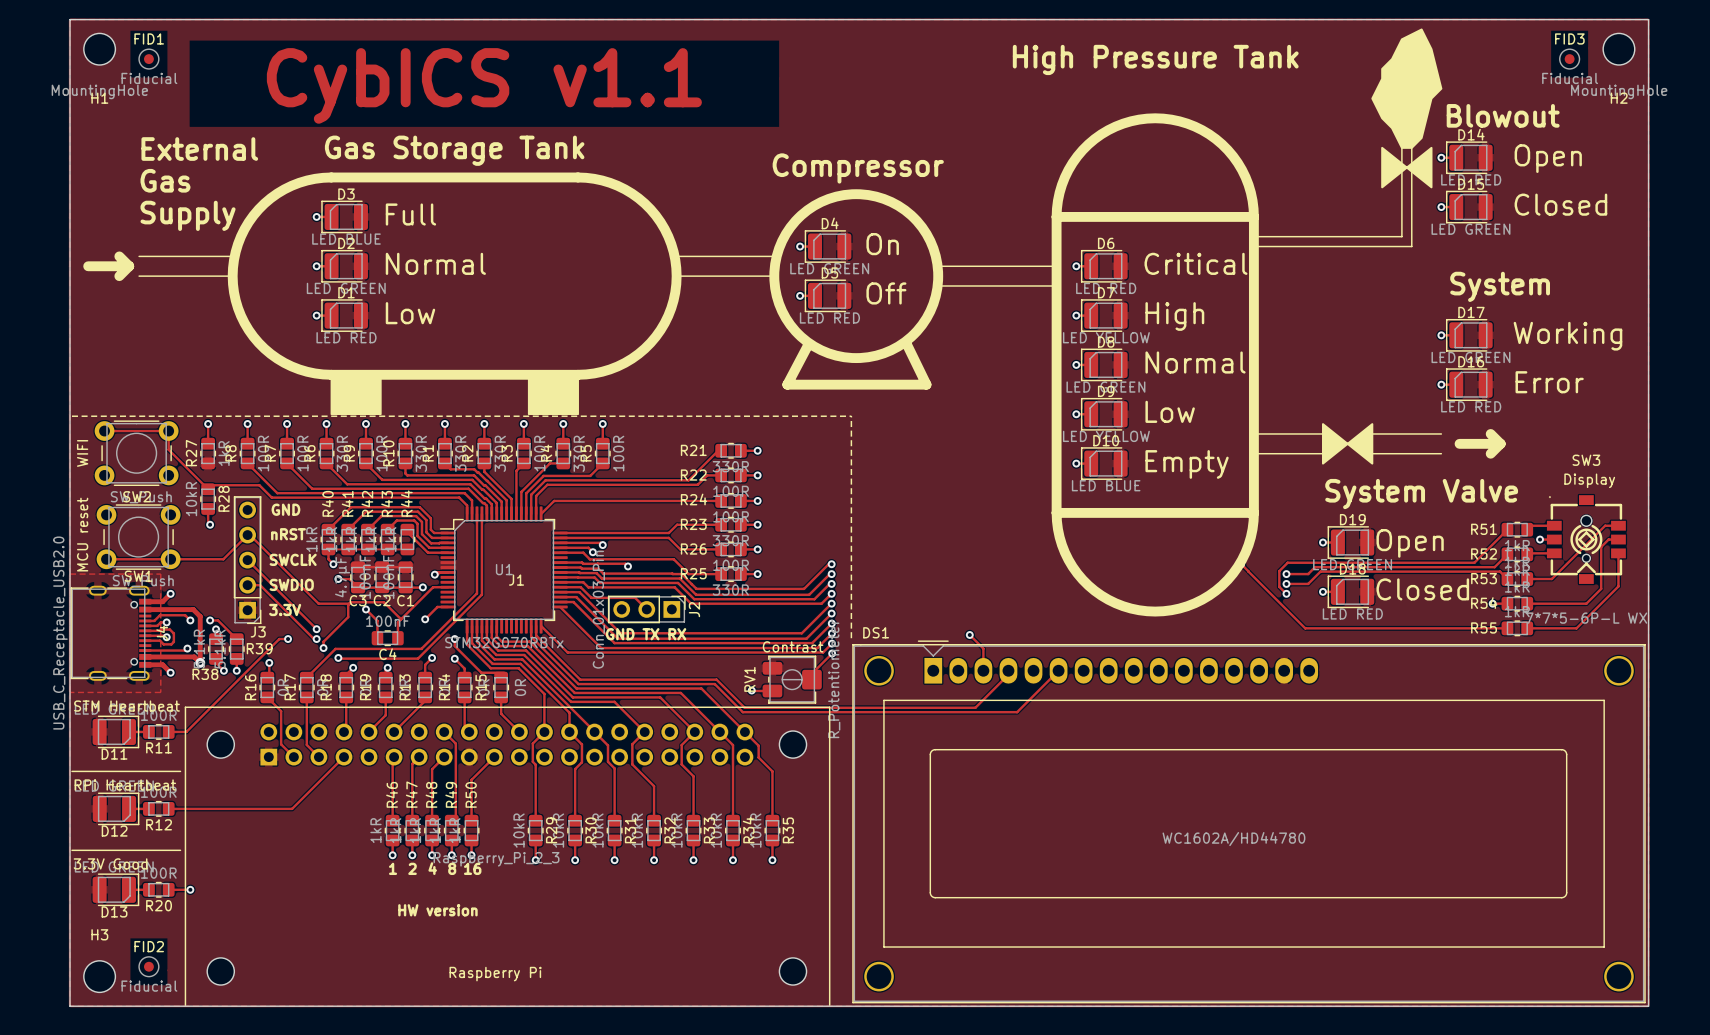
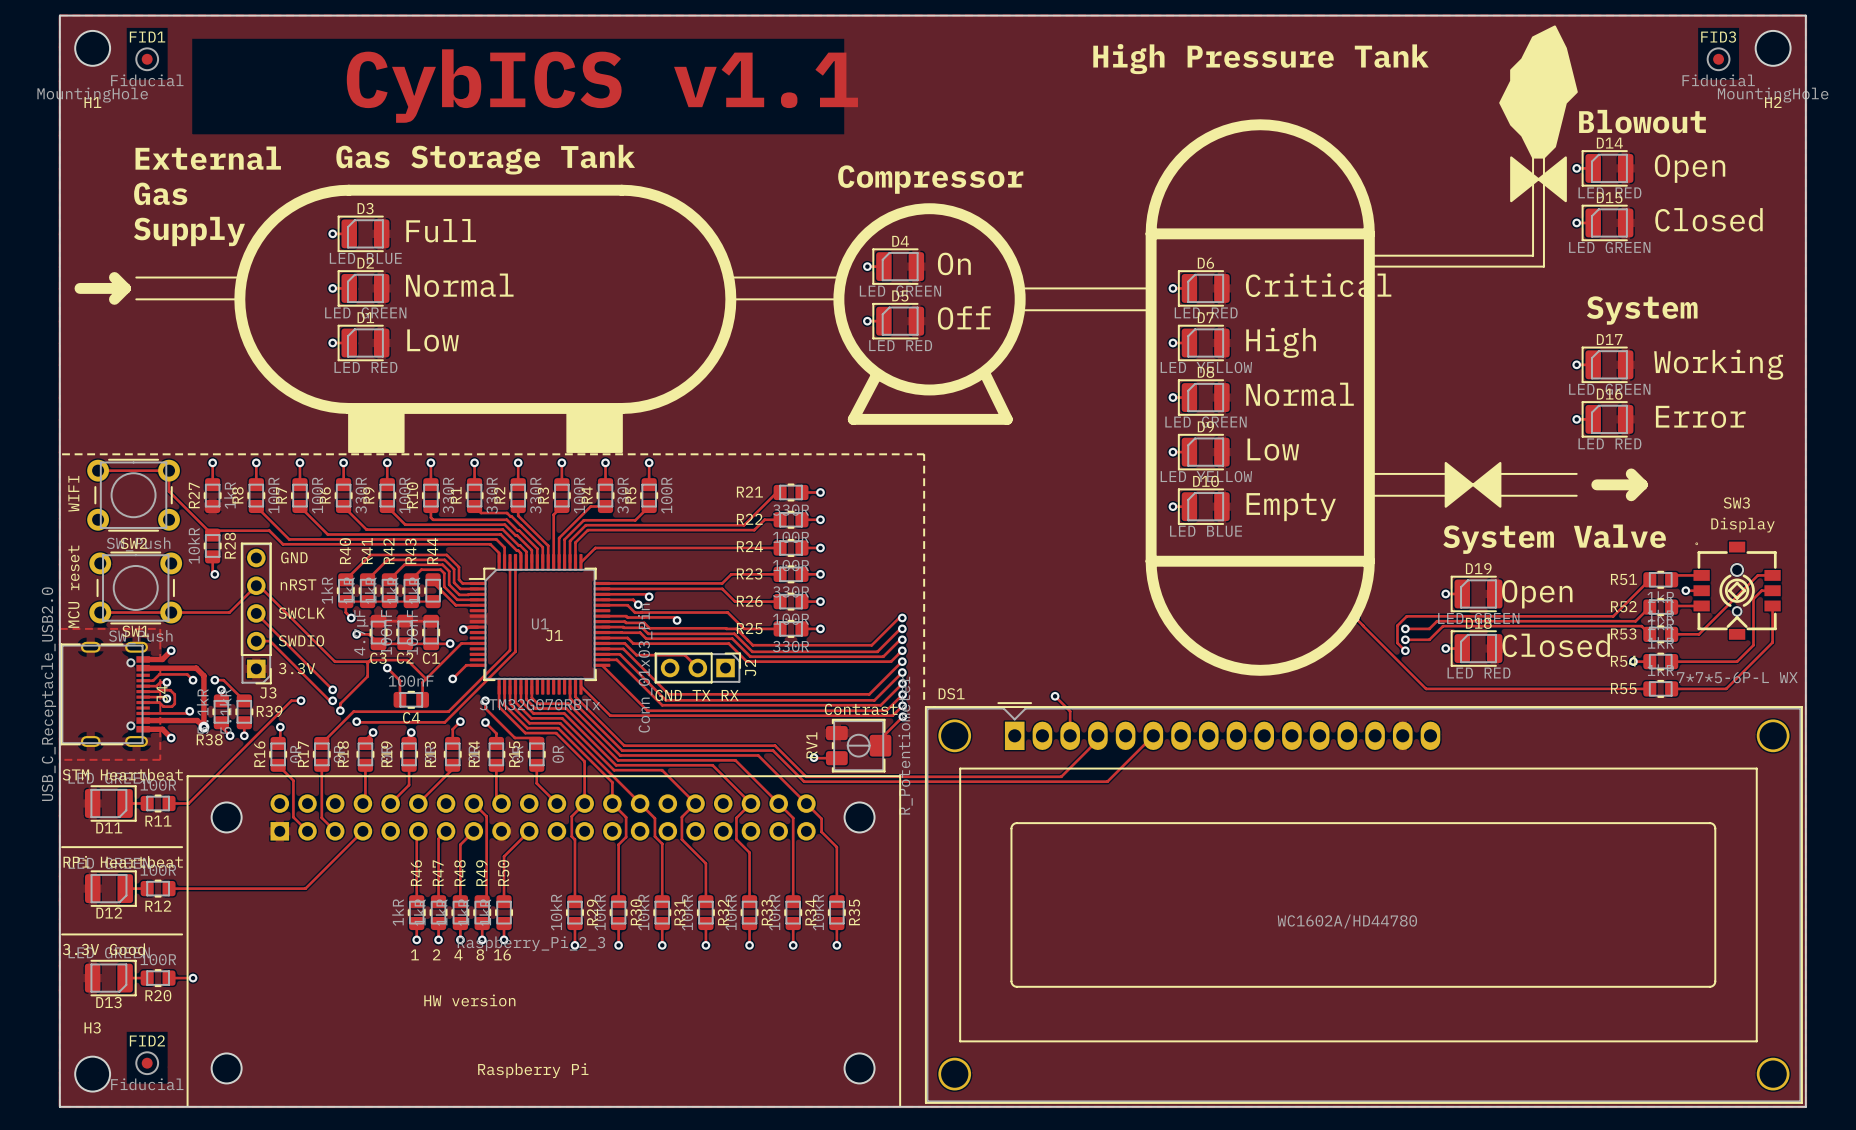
text position: CybICS v1.1 (484, 85) -> CybICS v1.1 (602, 86)

